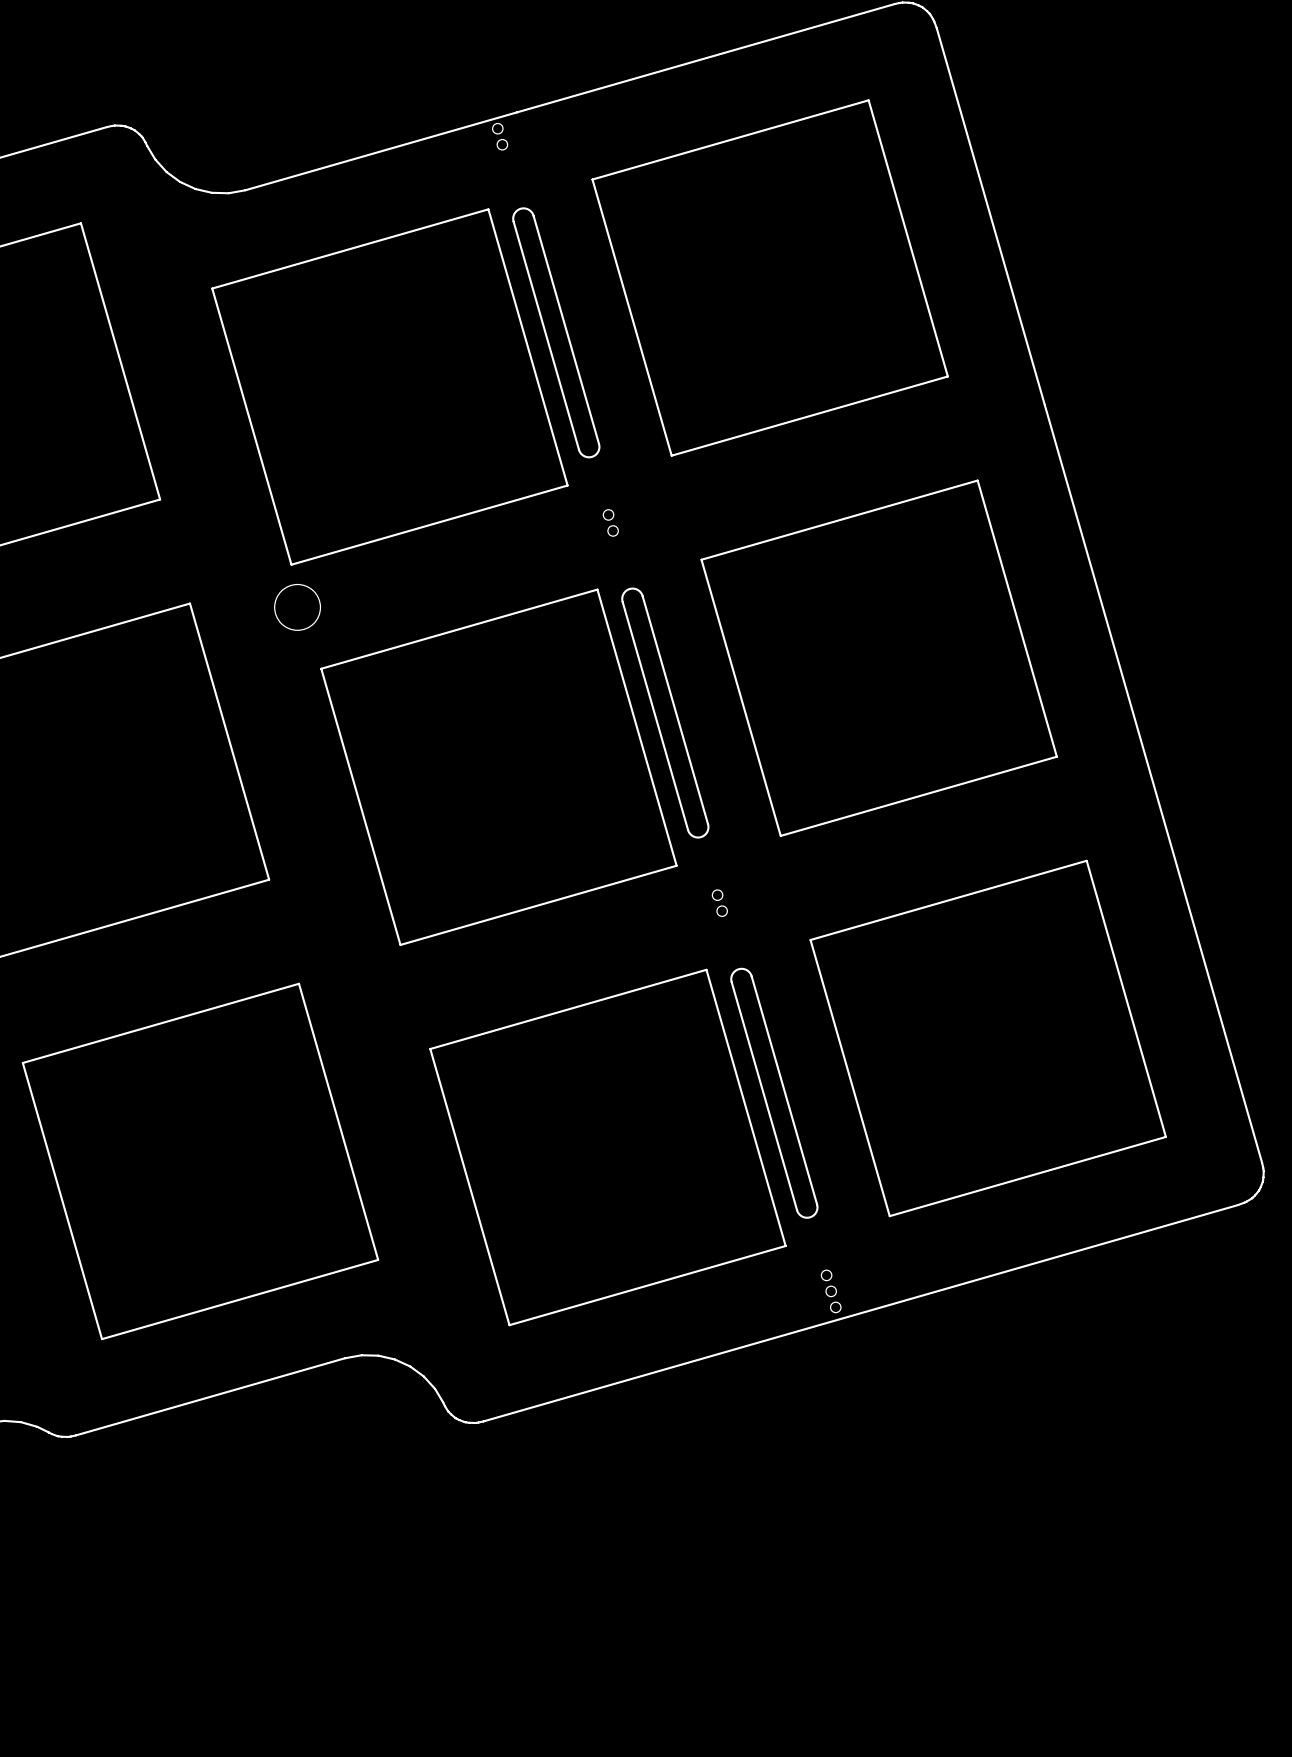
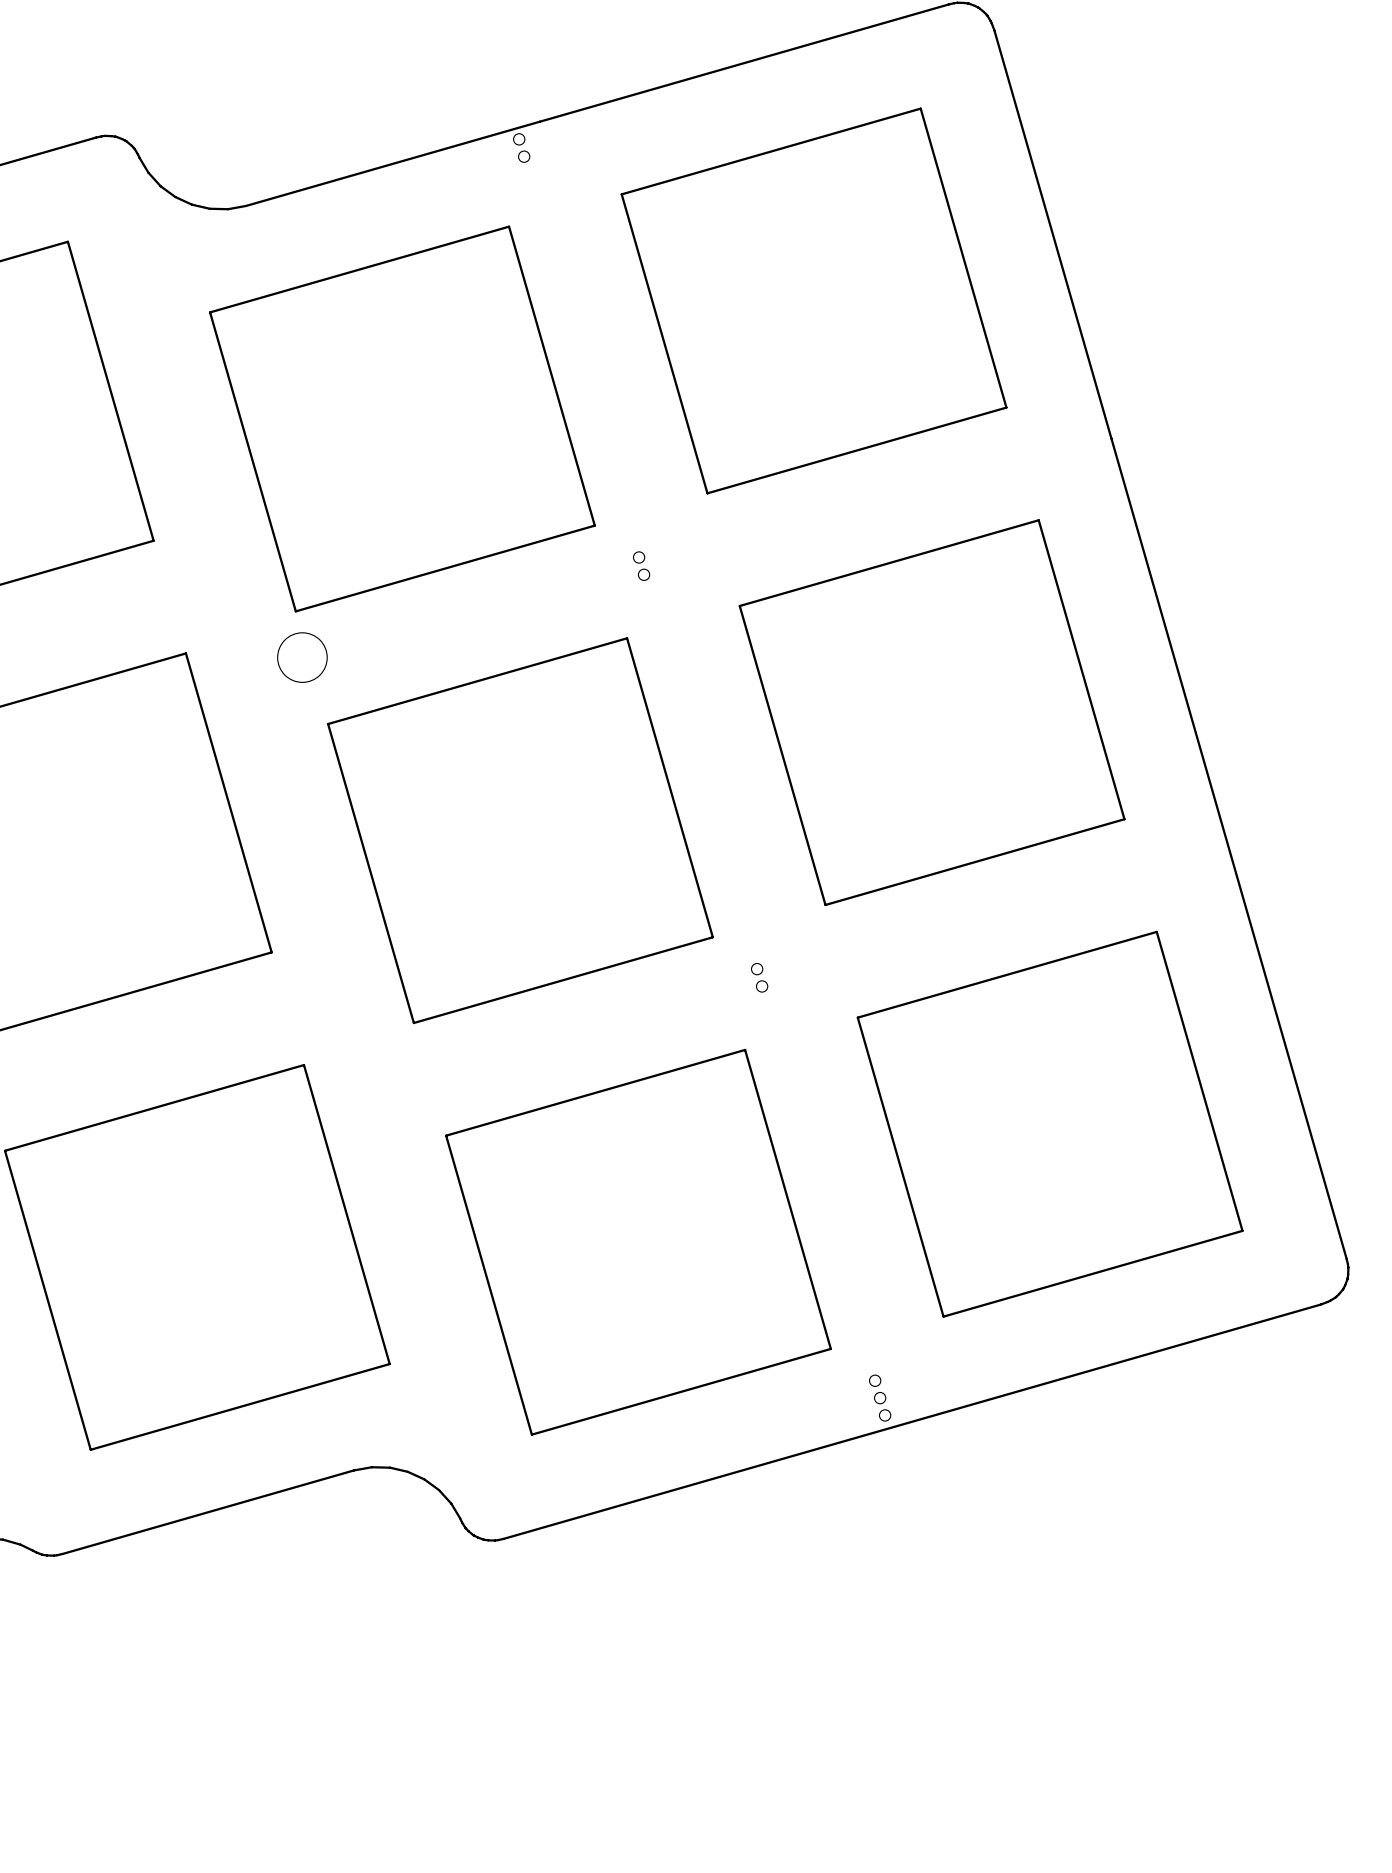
board edge: (533, 215) (599, 444) (597, 452) (591, 456) (583, 455) (579, 449) (513, 221) (514, 213) (520, 208) (528, 209) (533, 215) -> none
board edge: (642, 596) (708, 824) (706, 832) (700, 837) (693, 836) (688, 830) (622, 601) (623, 593) (629, 588) (638, 590) (642, 596) -> none
board edge: (751, 976) (817, 1204) (815, 1212) (809, 1217) (802, 1216) (797, 1210) (731, 982) (732, 973) (738, 969) (747, 970) (751, 976) -> none

